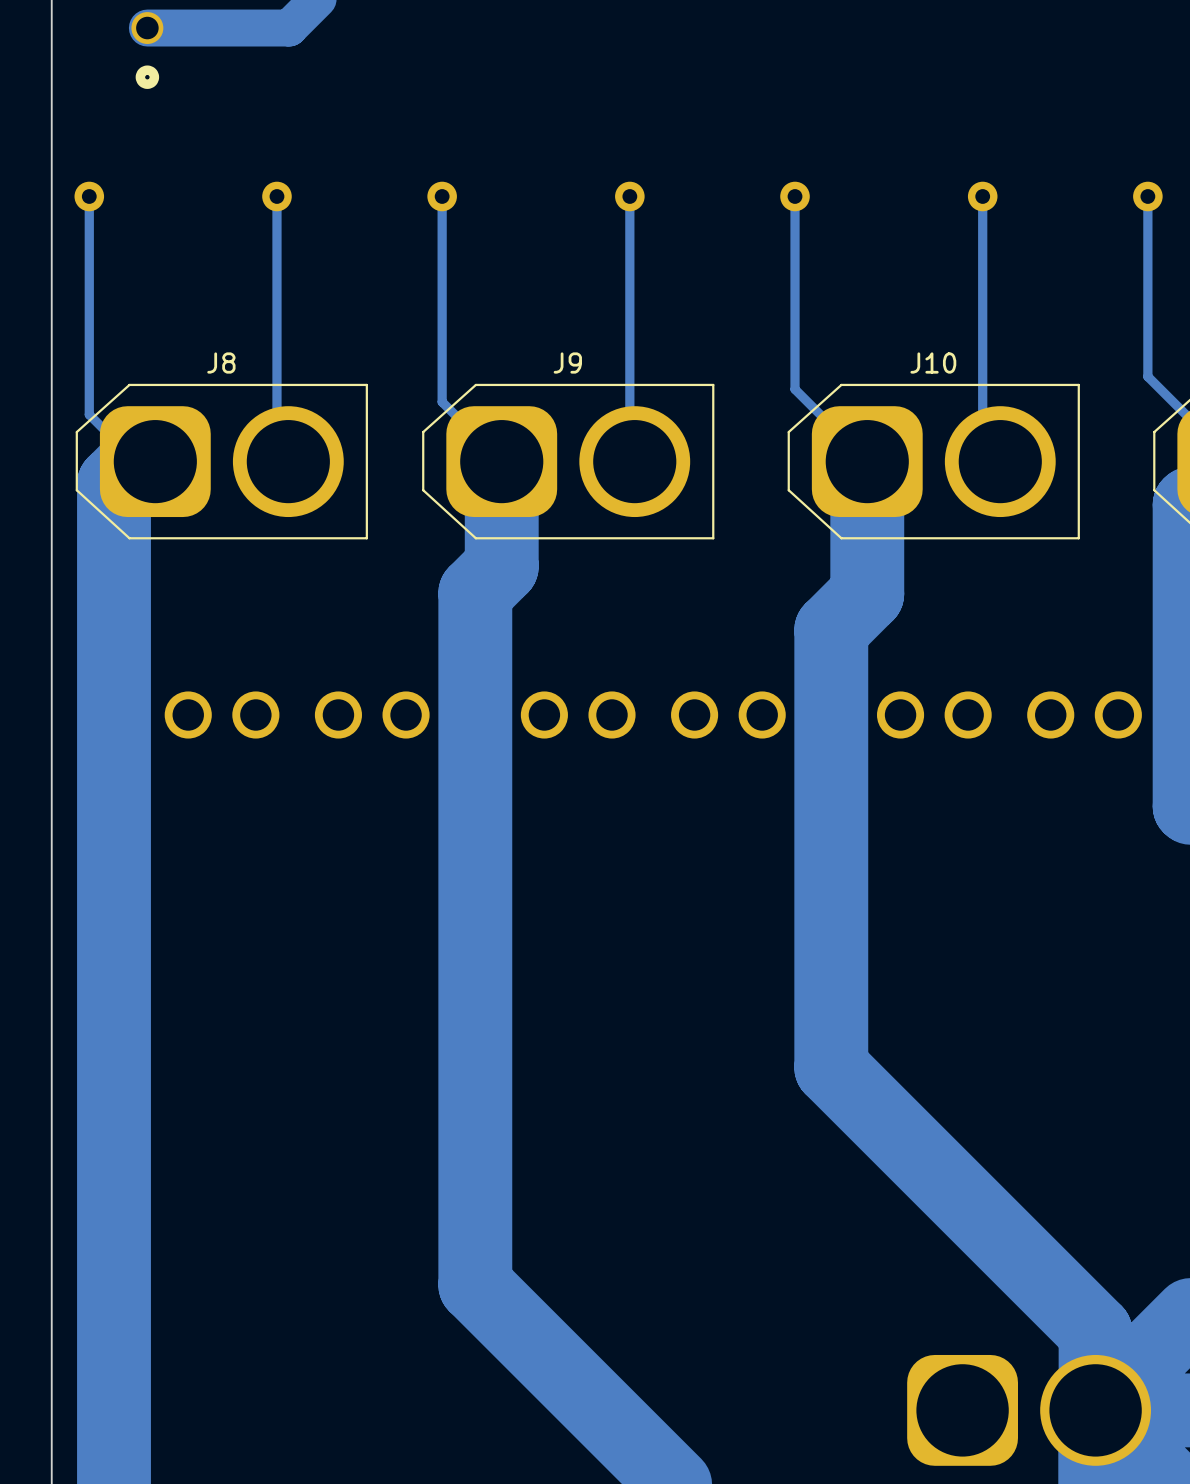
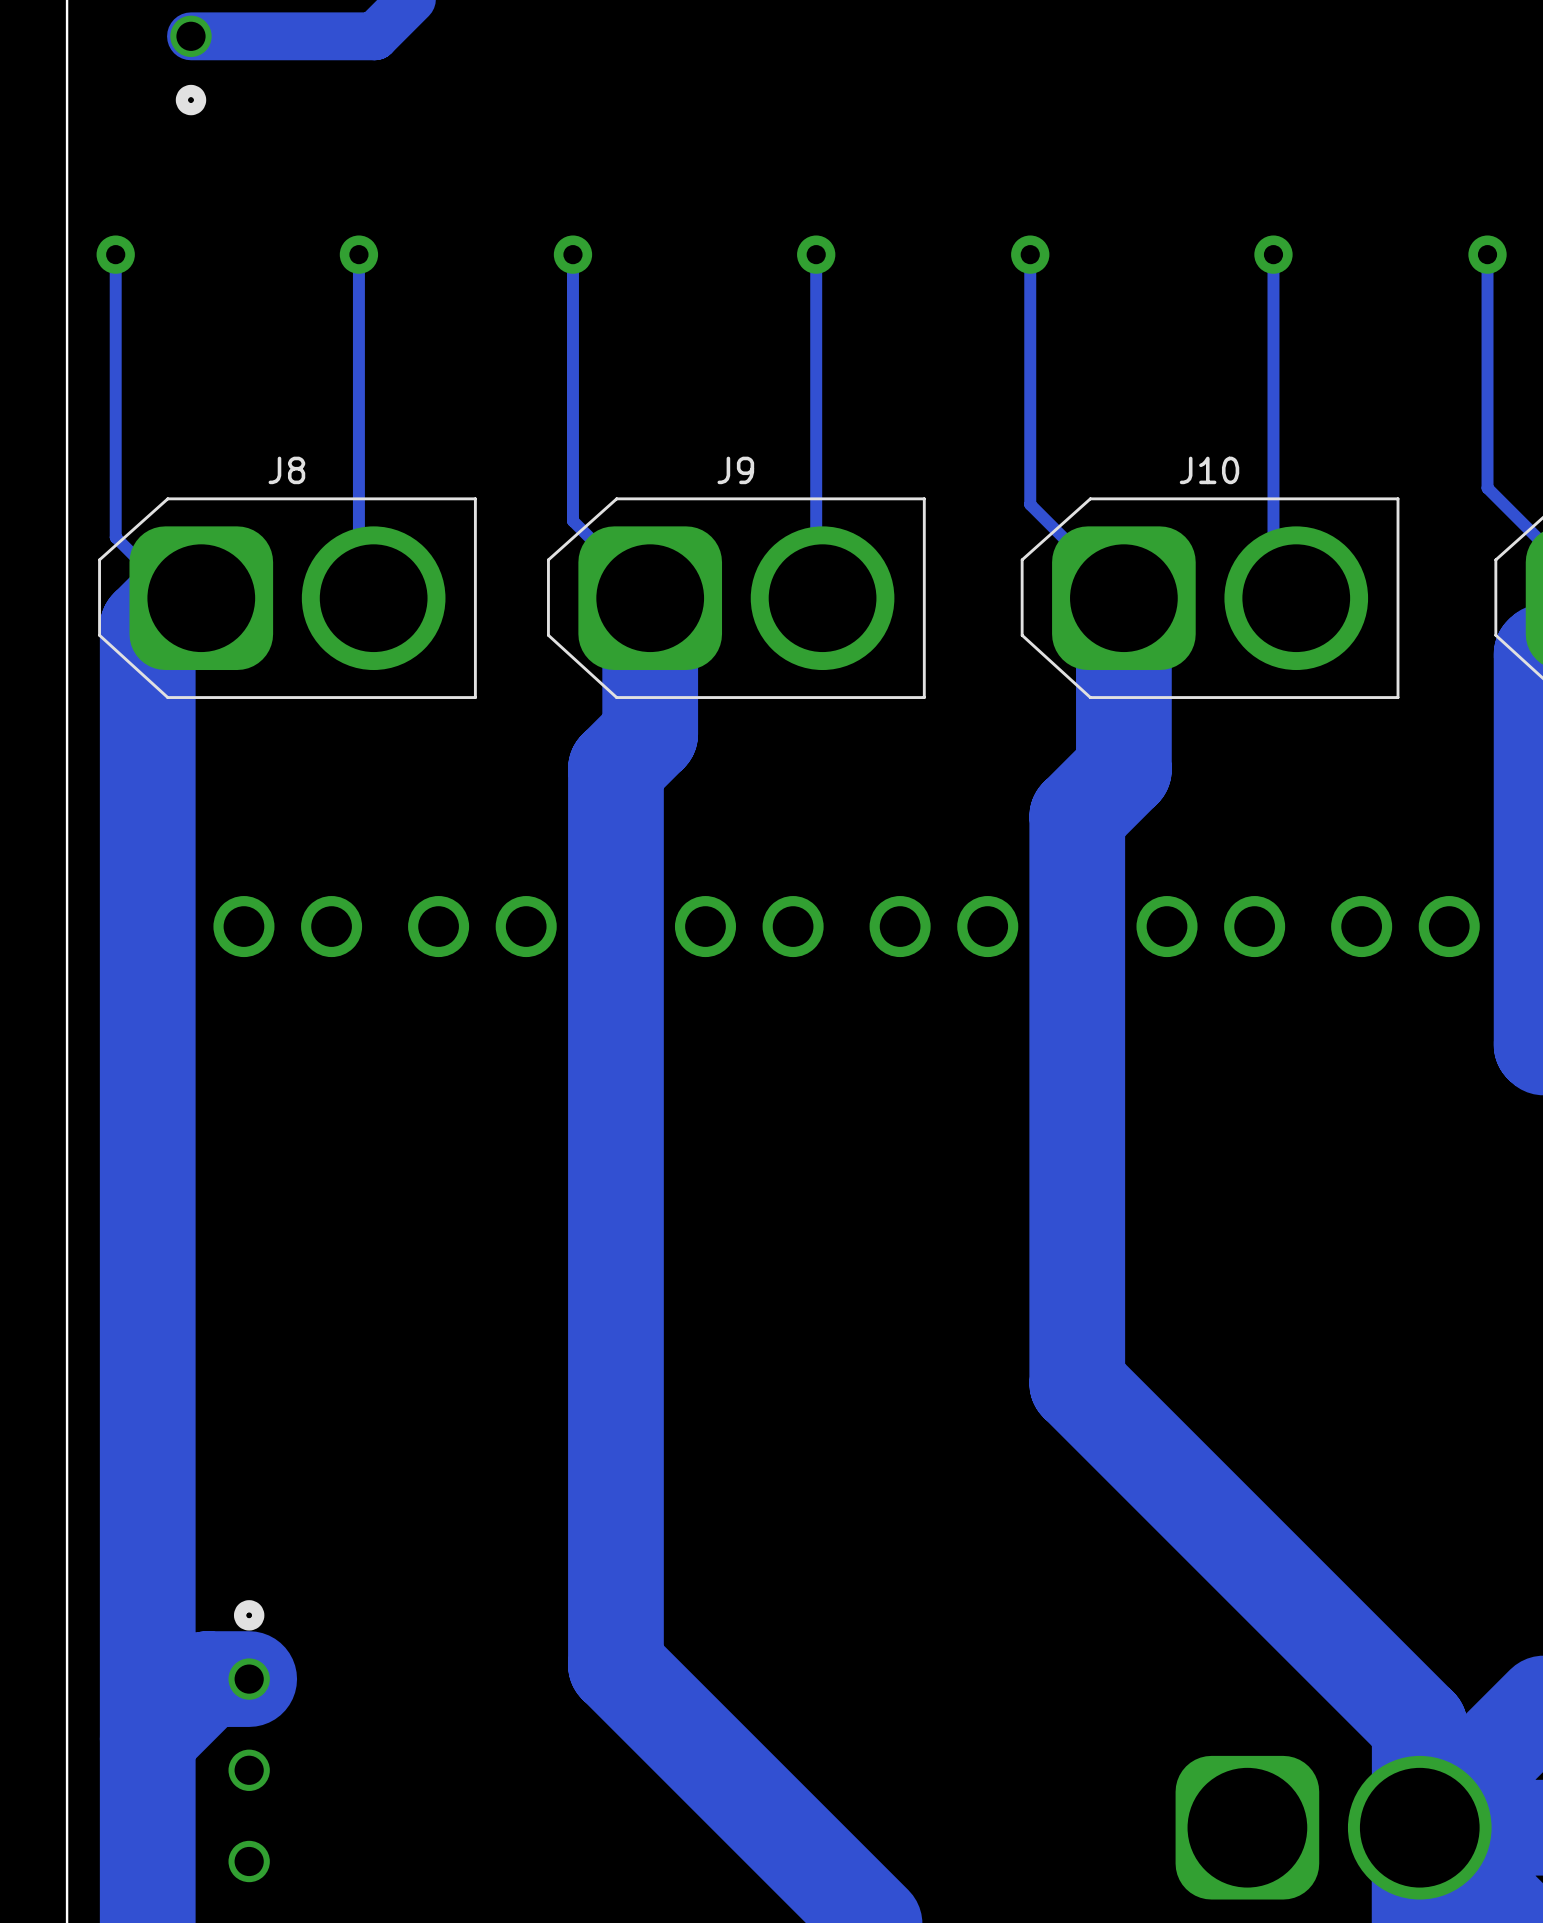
track: none -> (249, 1679) (207, 1679) (147, 1738)
part: none -> (249, 1741)

